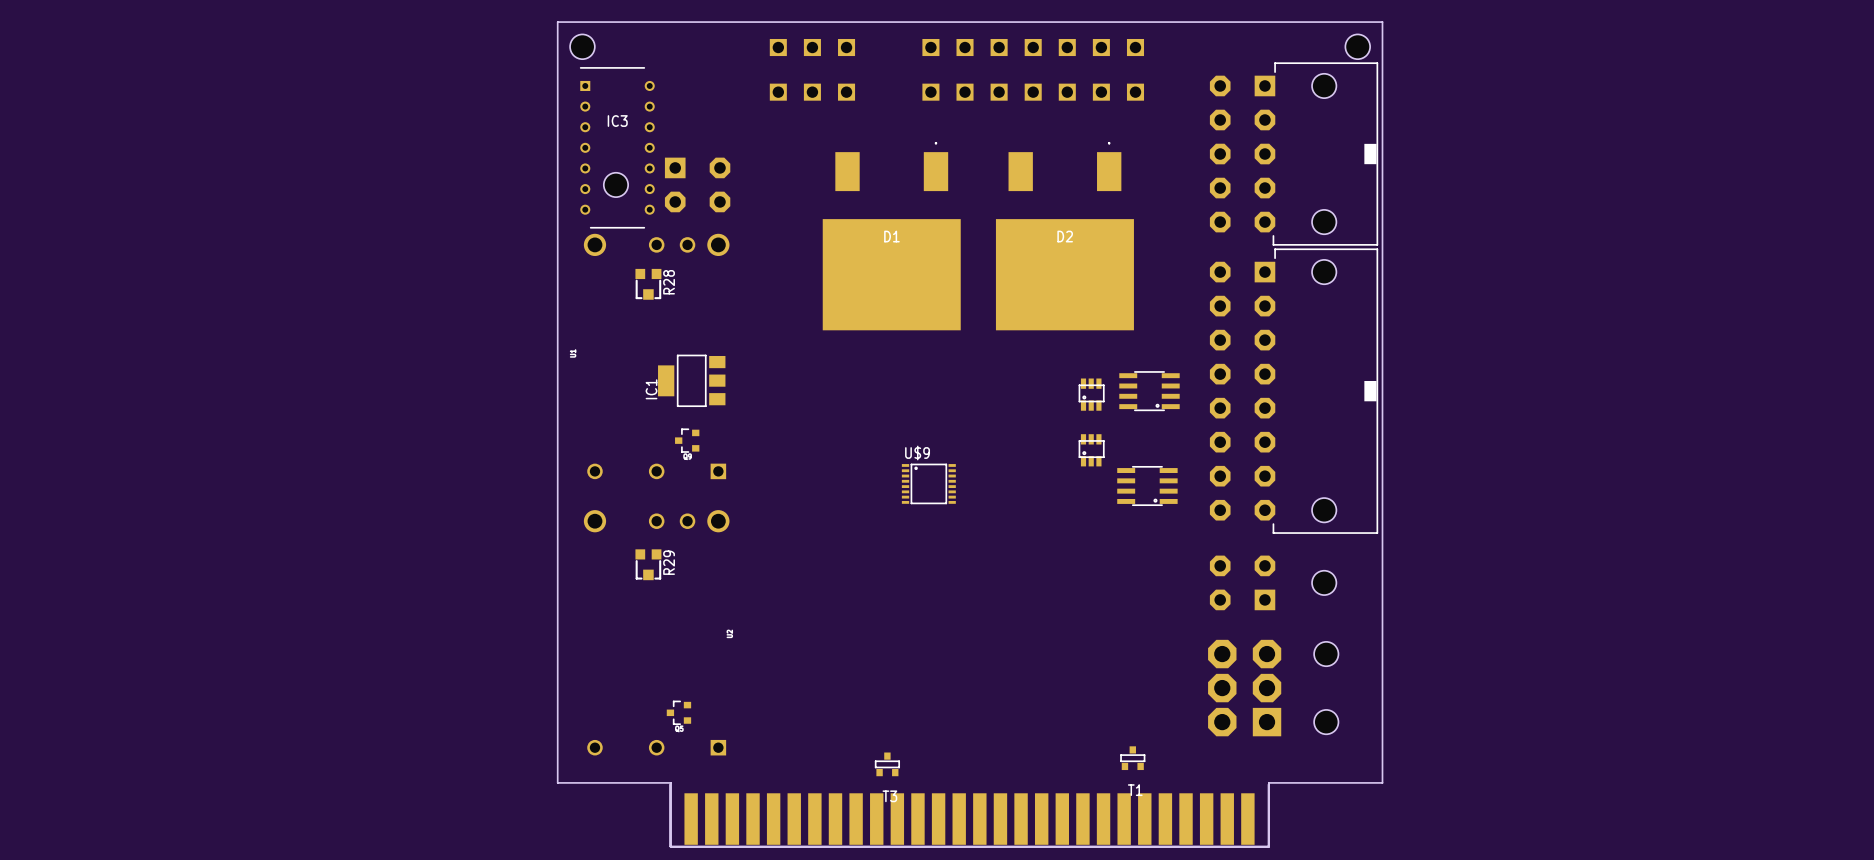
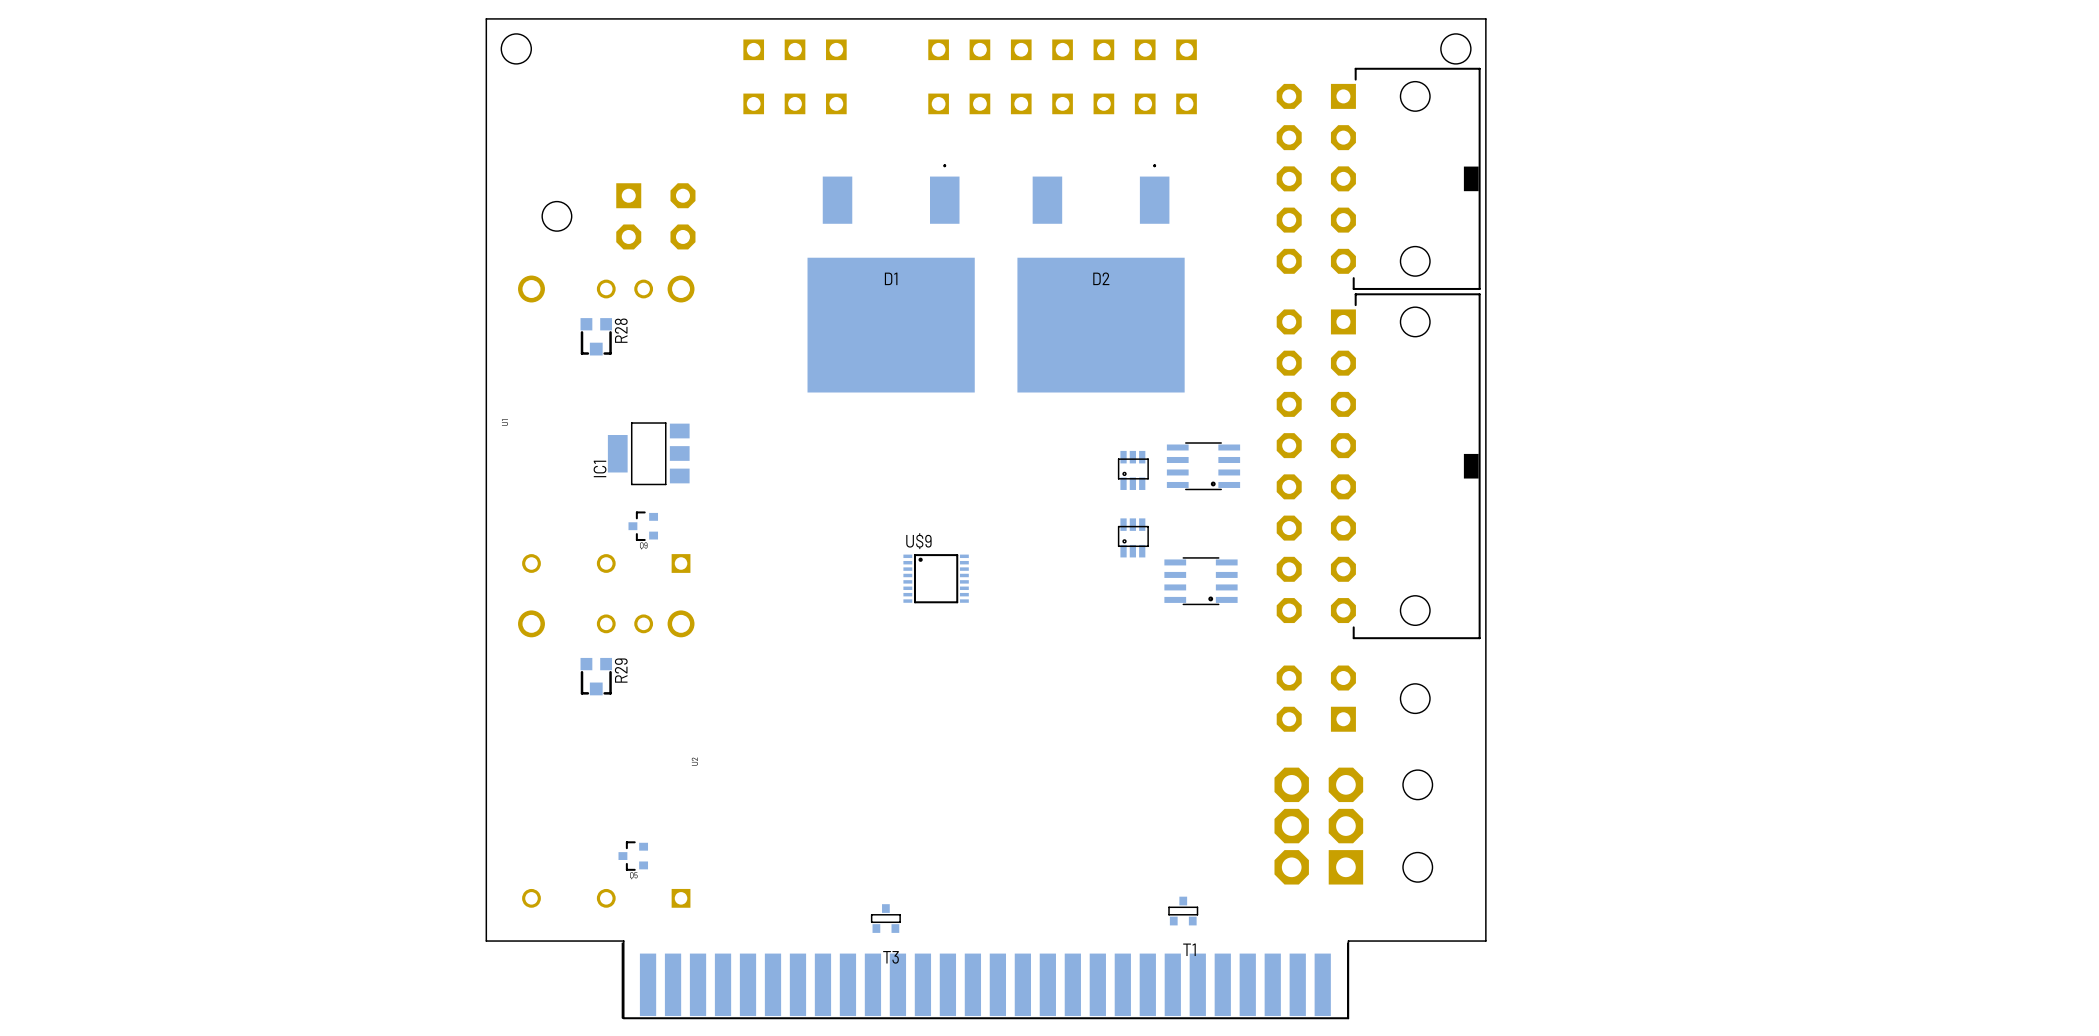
IC3: (617, 147) -> none

